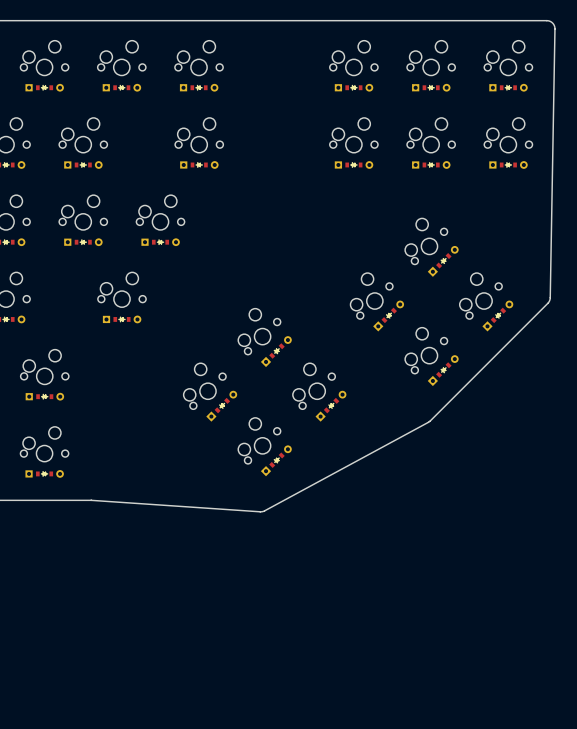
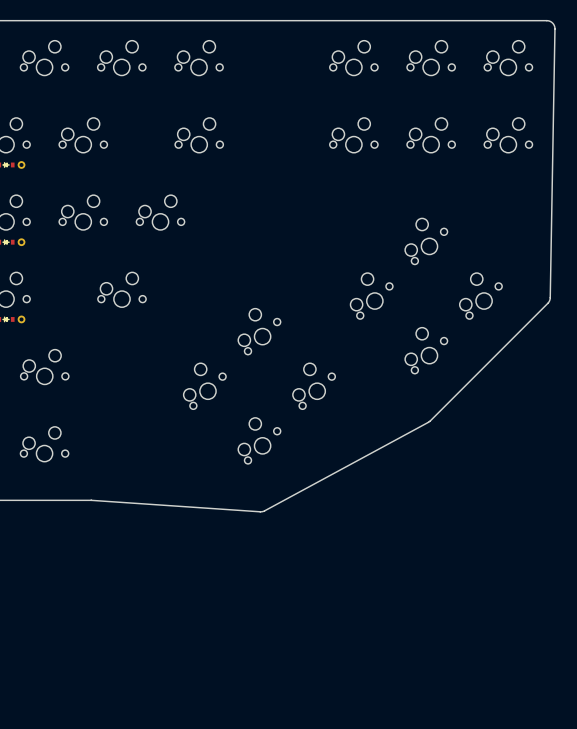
part: (44, 87) -> none
part: (121, 87) -> none
part: (199, 87) -> none
part: (354, 87) -> none
part: (431, 87) -> none
part: (508, 87) -> none
part: (83, 164) -> none
part: (199, 164) -> none
part: (354, 164) -> none
part: (431, 164) -> none
part: (508, 164) -> none
part: (83, 242) -> none
part: (160, 242) -> none
part: (443, 261) -> none
part: (388, 316) -> none
part: (497, 316) -> none
part: (122, 319) -> none
part: (276, 351) -> none
part: (443, 370) -> none
part: (44, 396) -> none
part: (221, 406) -> none
part: (330, 406) -> none
part: (276, 460) -> none
part: (44, 473) -> none

